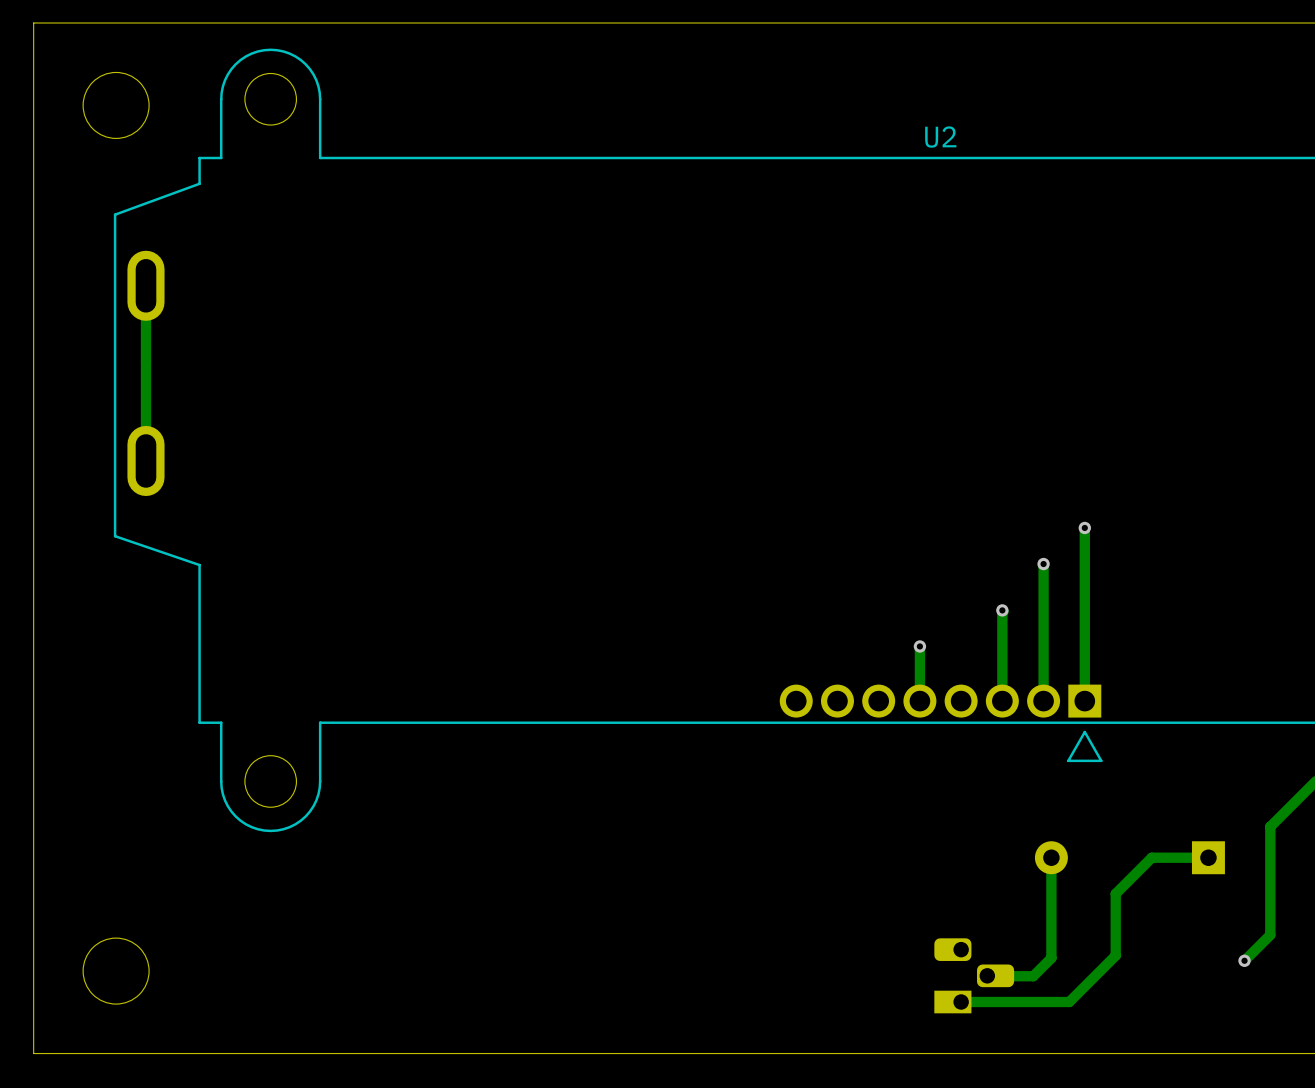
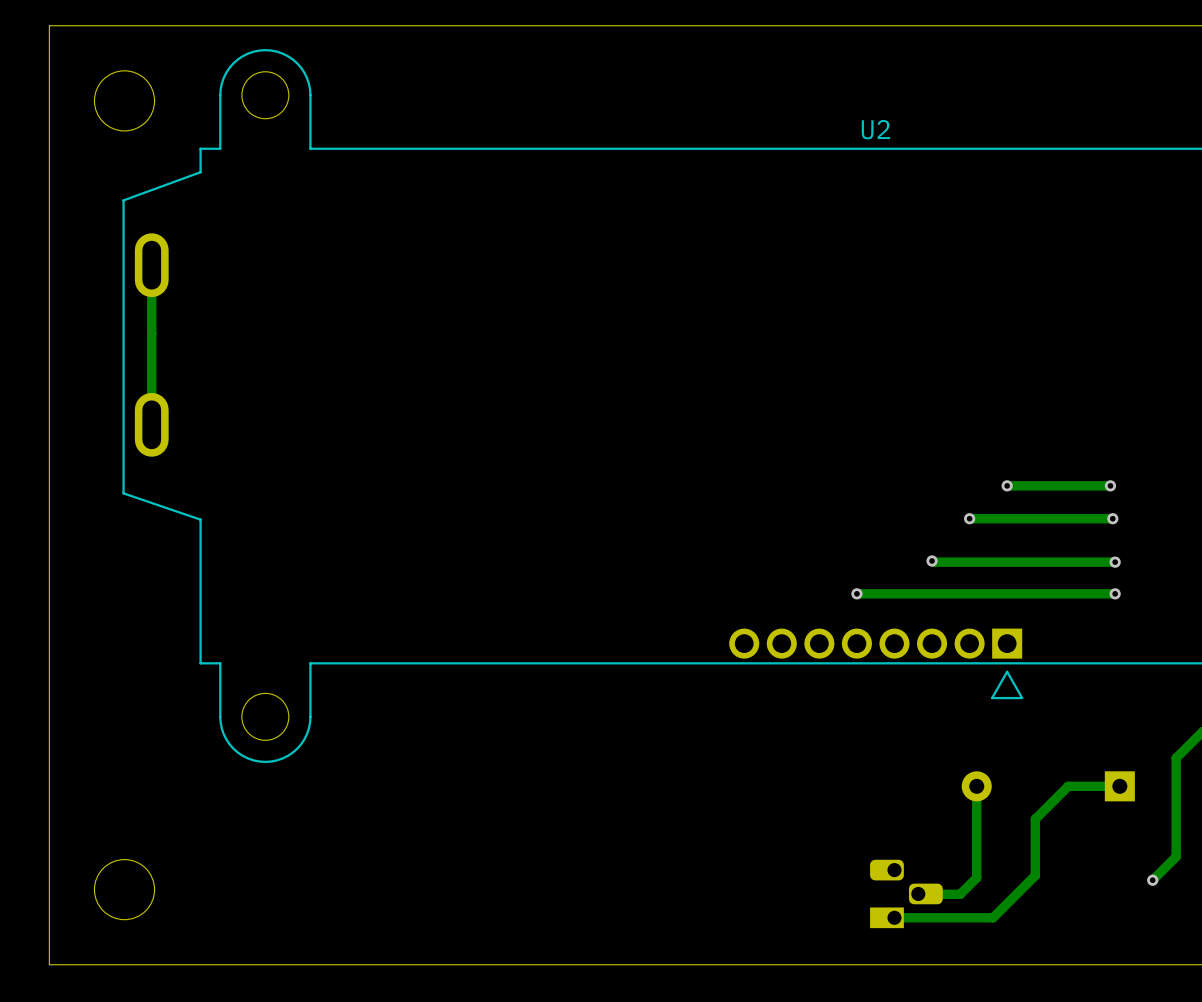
track: (1084, 527) (1084, 701) -> (1007, 485) (1110, 485)
via: none -> (1110, 485)
track: (1043, 564) (1043, 701) -> (969, 518) (1112, 518)
via: none -> (1112, 518)
track: (1002, 610) (1002, 701) -> none
track: none -> (1115, 562) (933, 562)
via: none -> (1115, 562)
track: (919, 646) (919, 701) -> (856, 593) (1115, 593)
via: none -> (1115, 593)

